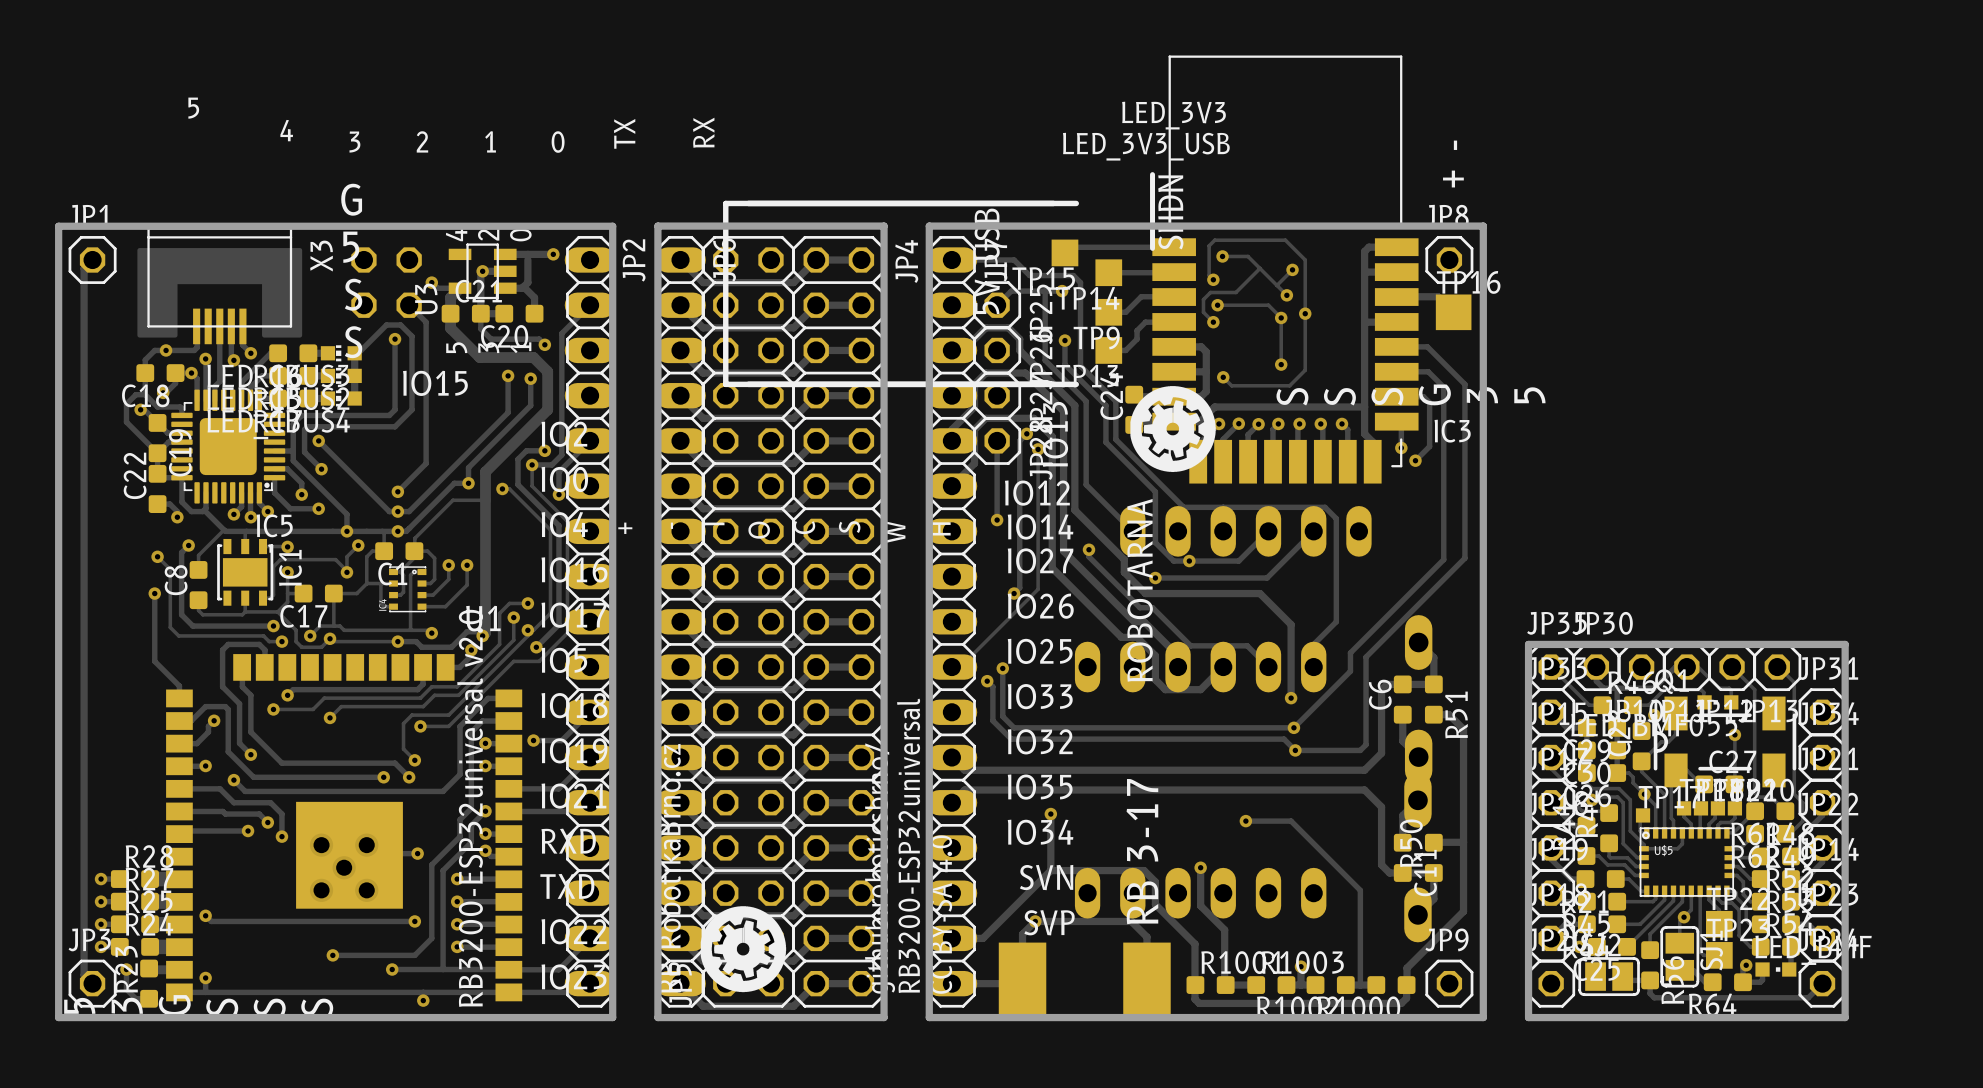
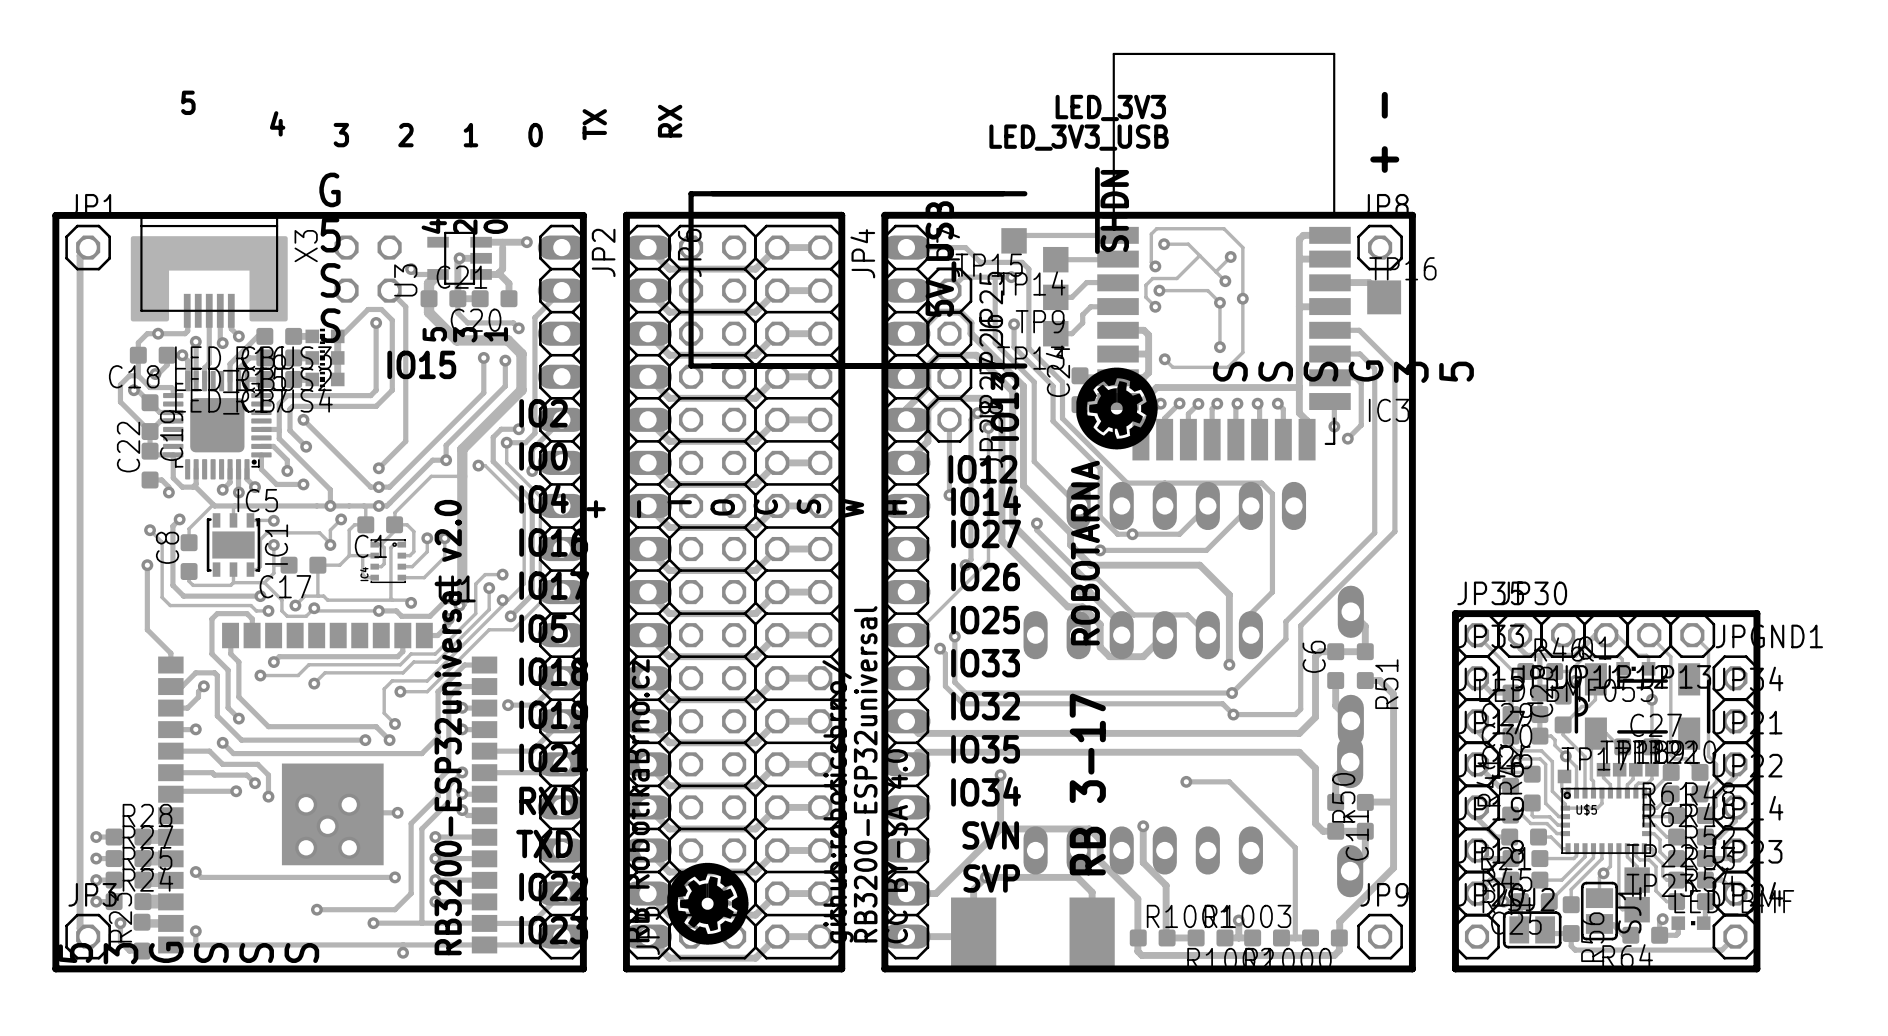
JP31 name: JP31 (1828, 668) -> JPGND1 (1769, 636)

